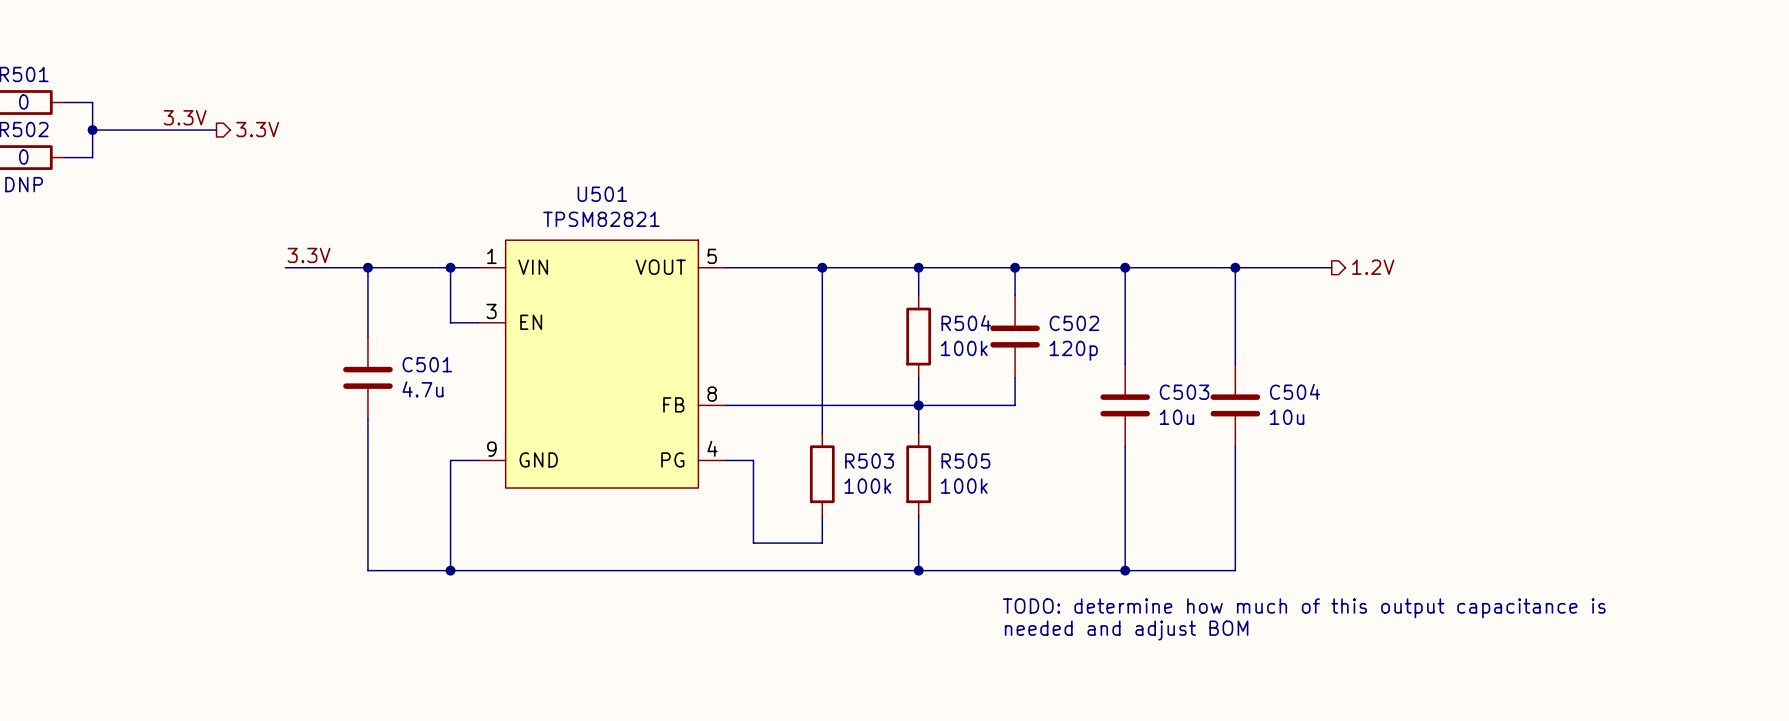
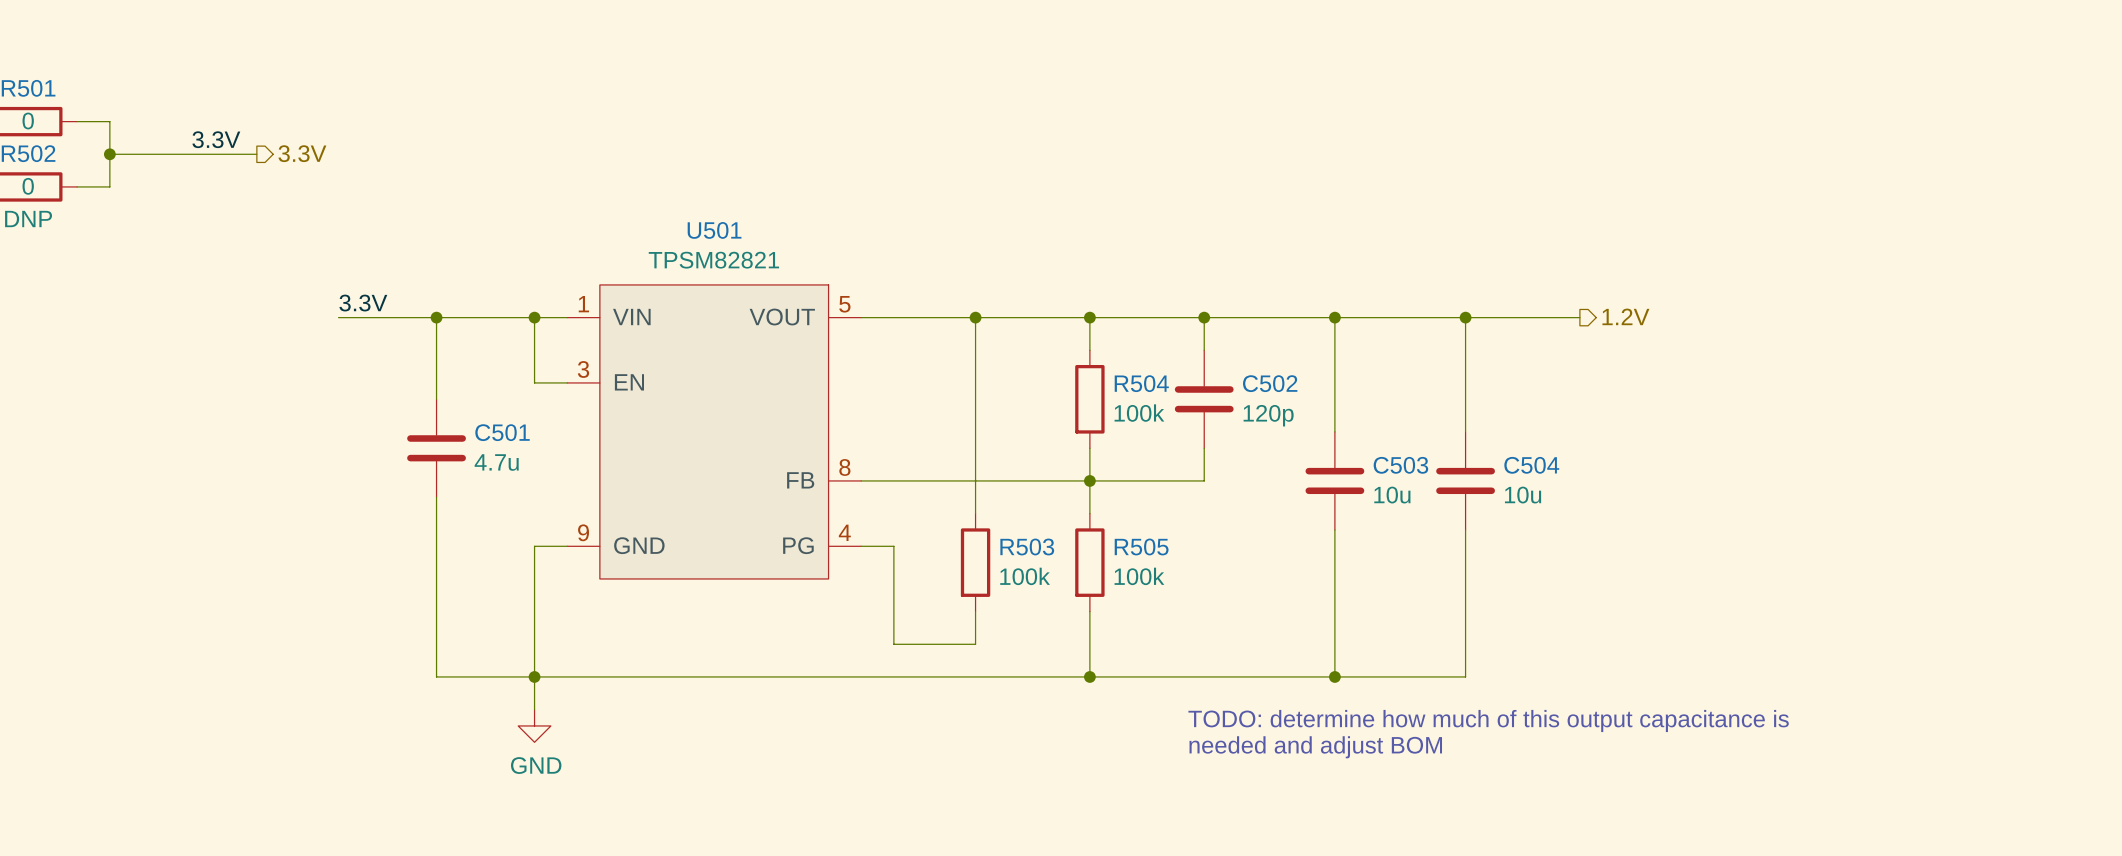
wire: none -> (534, 676) (534, 709)
power symbol: none -> GND (534, 725)

